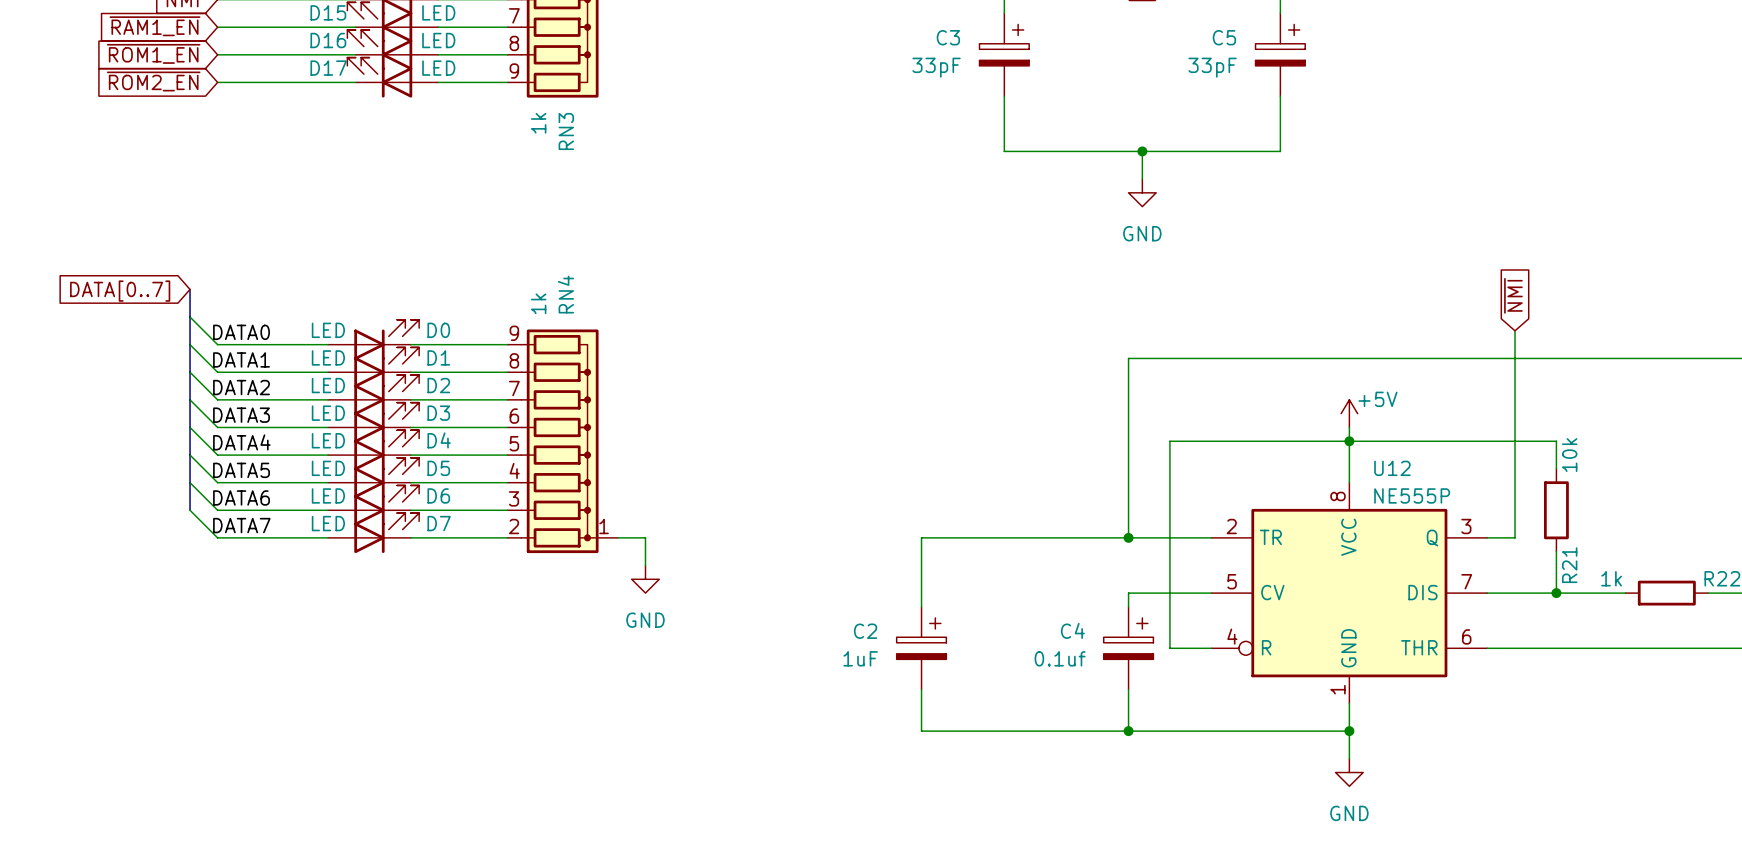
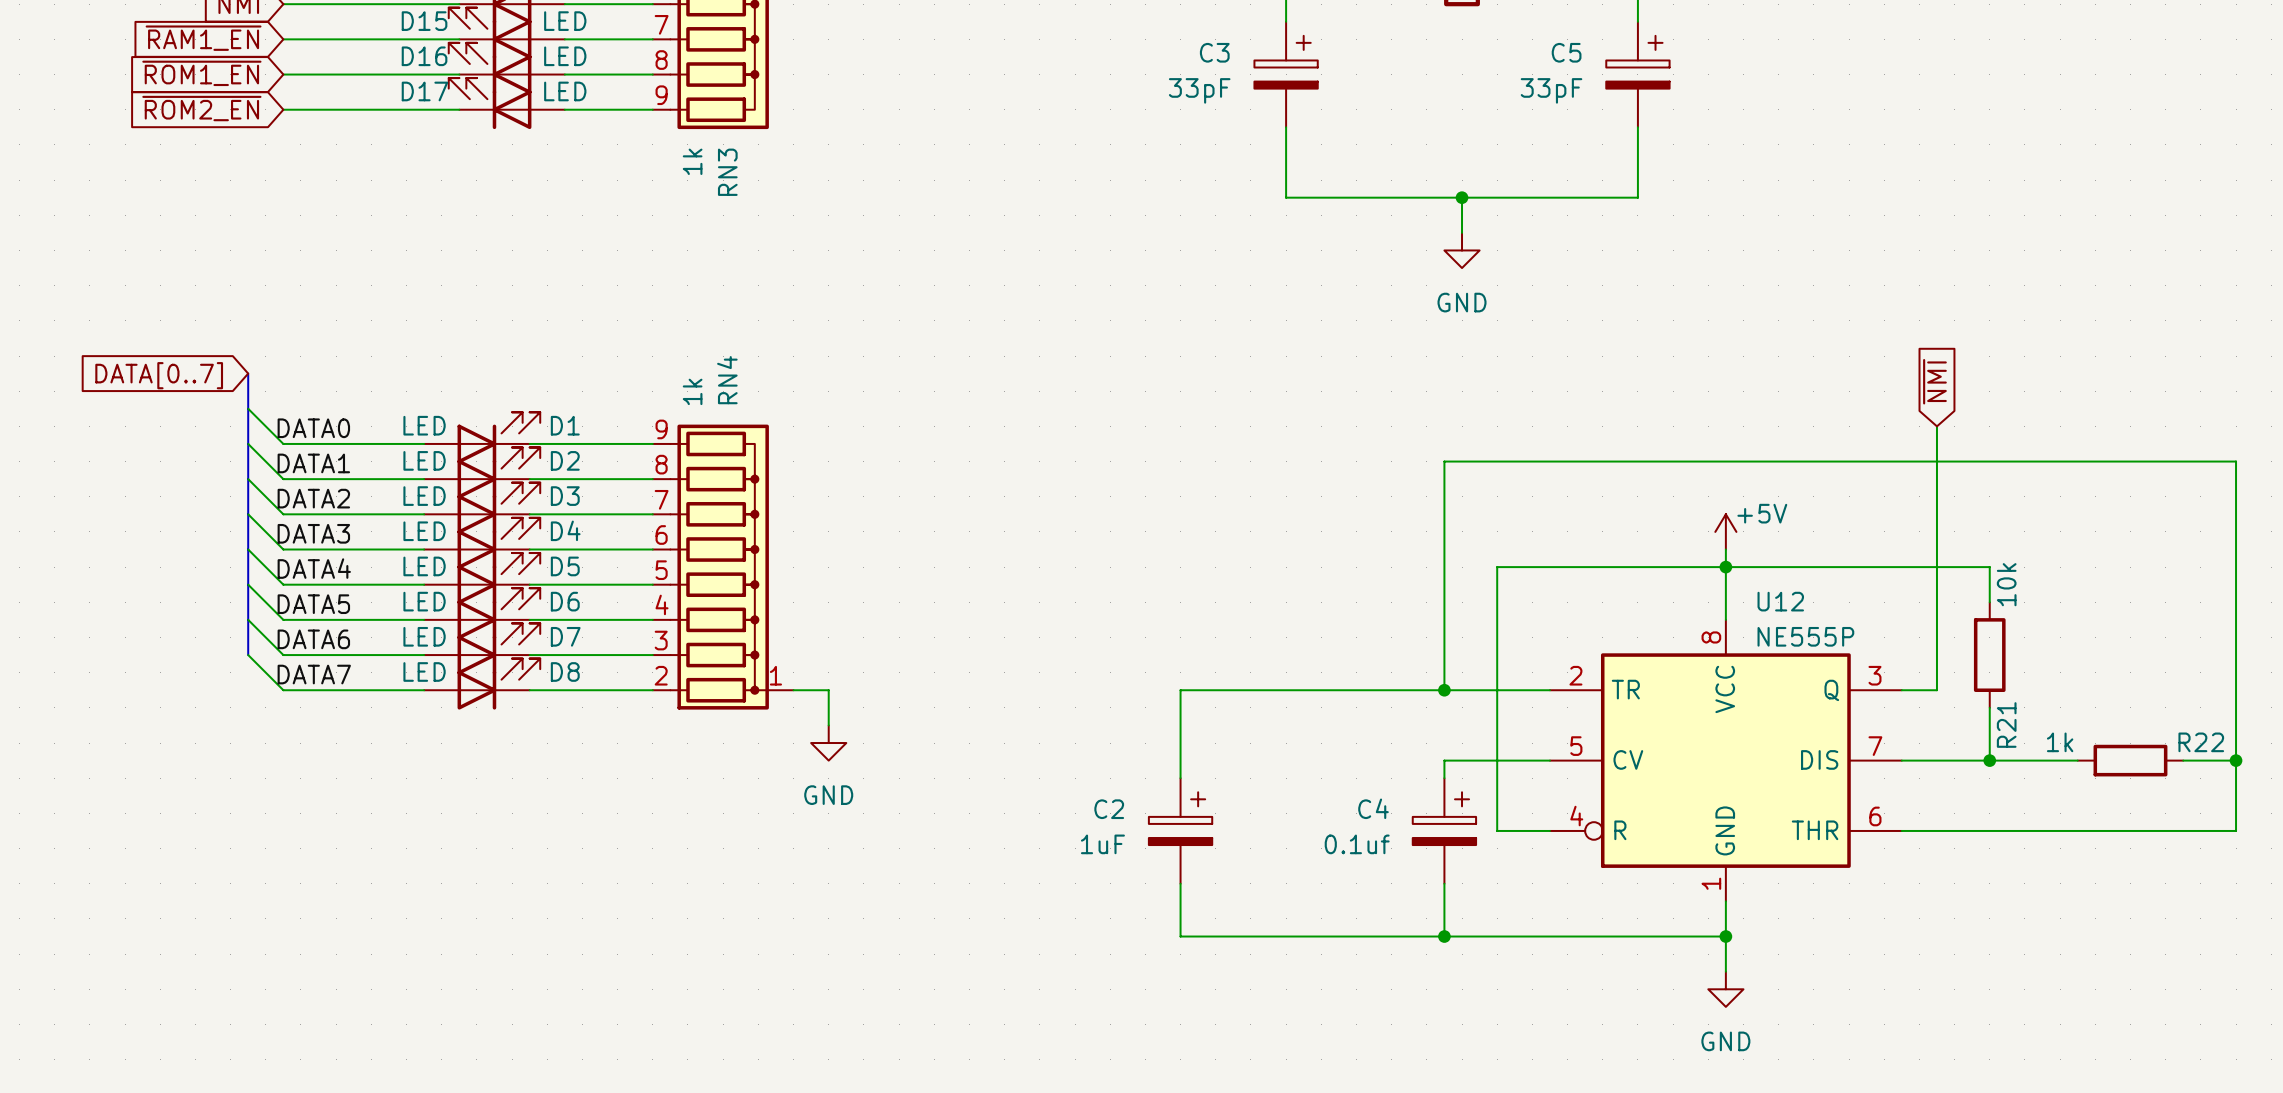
D0 name: D0 (438, 330) -> D1 (565, 425)
D1 name: D1 (438, 357) -> D2 (565, 460)
D2 name: D2 (438, 385) -> D3 (565, 496)
D3 name: D3 (438, 413) -> D4 (565, 530)
D4 name: D4 (439, 440) -> D5 (565, 566)
D5 name: D5 (438, 468) -> D6 (565, 601)
D6 name: D6 (438, 495) -> D7 (565, 636)
D7 name: D7 (439, 523) -> D8 (565, 671)

